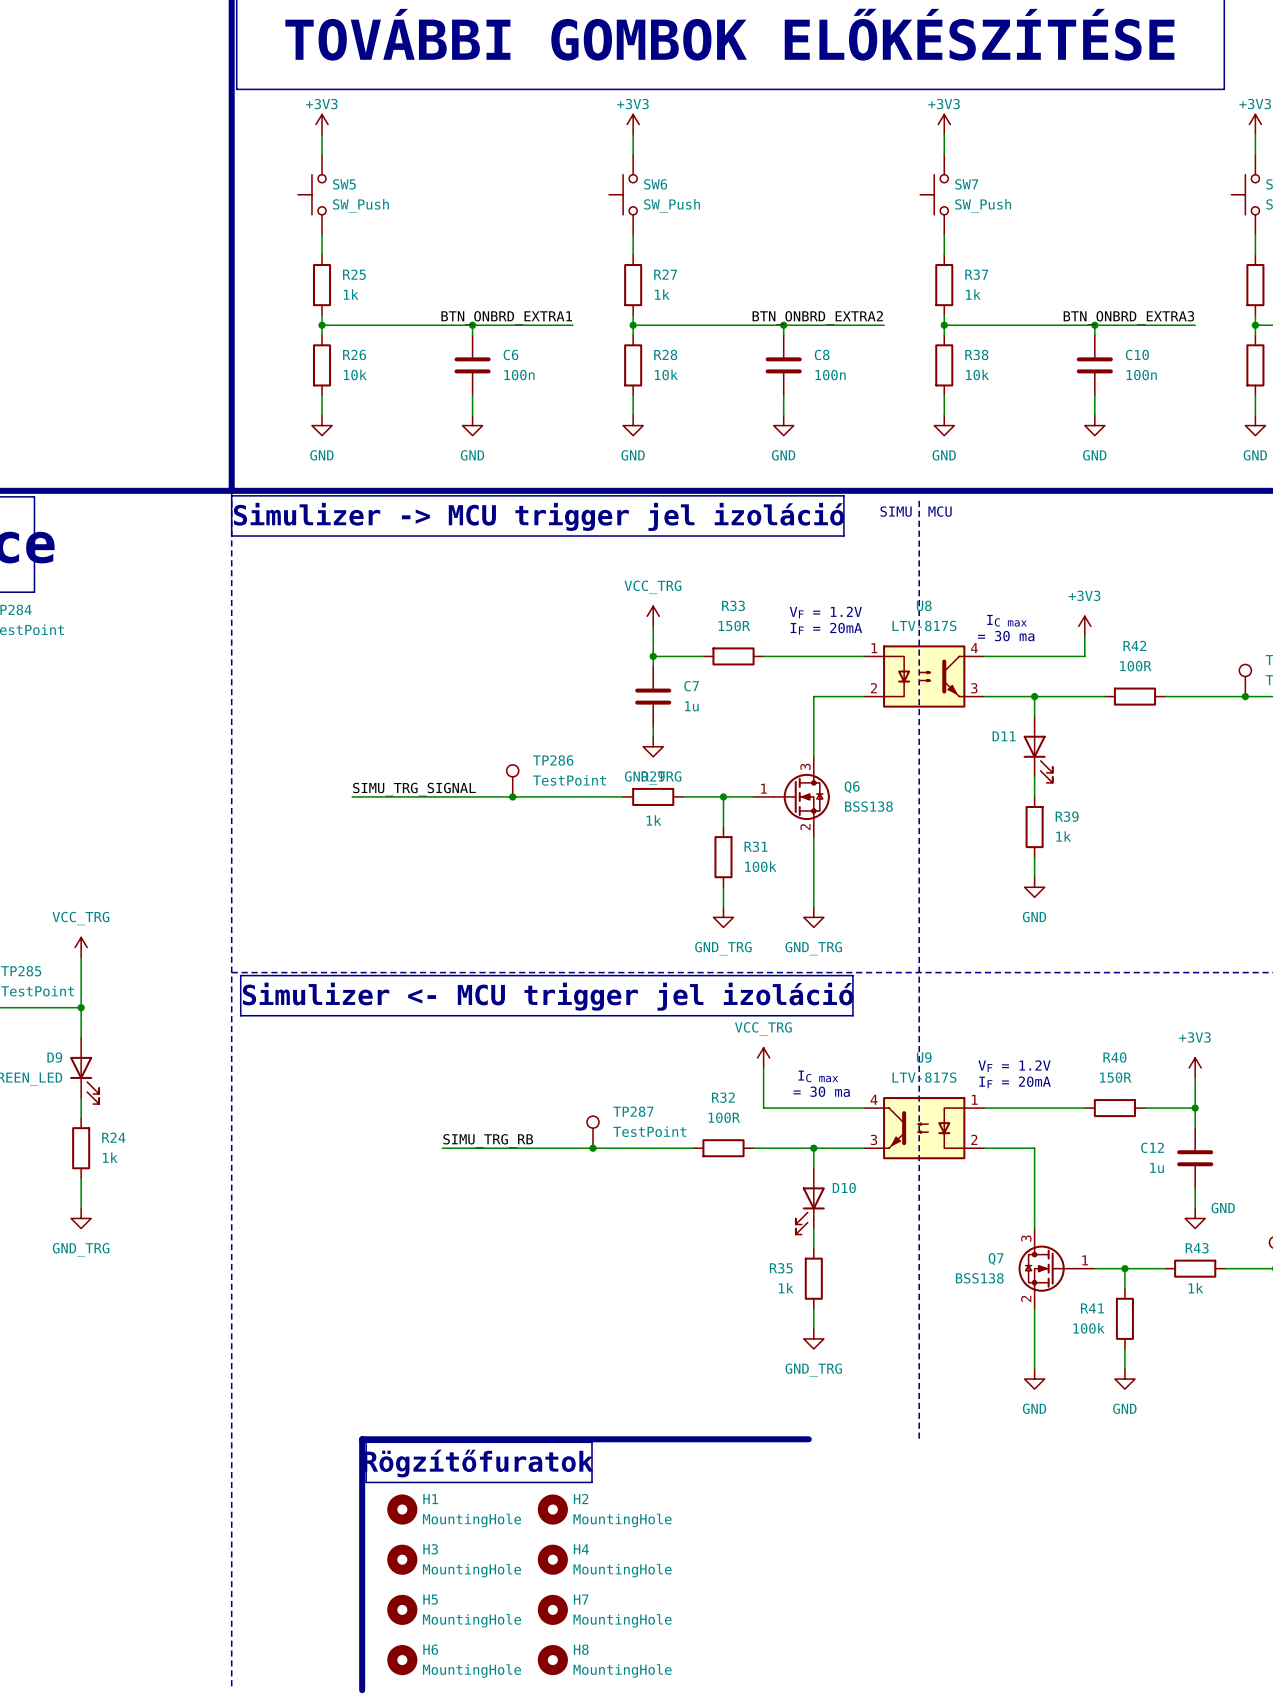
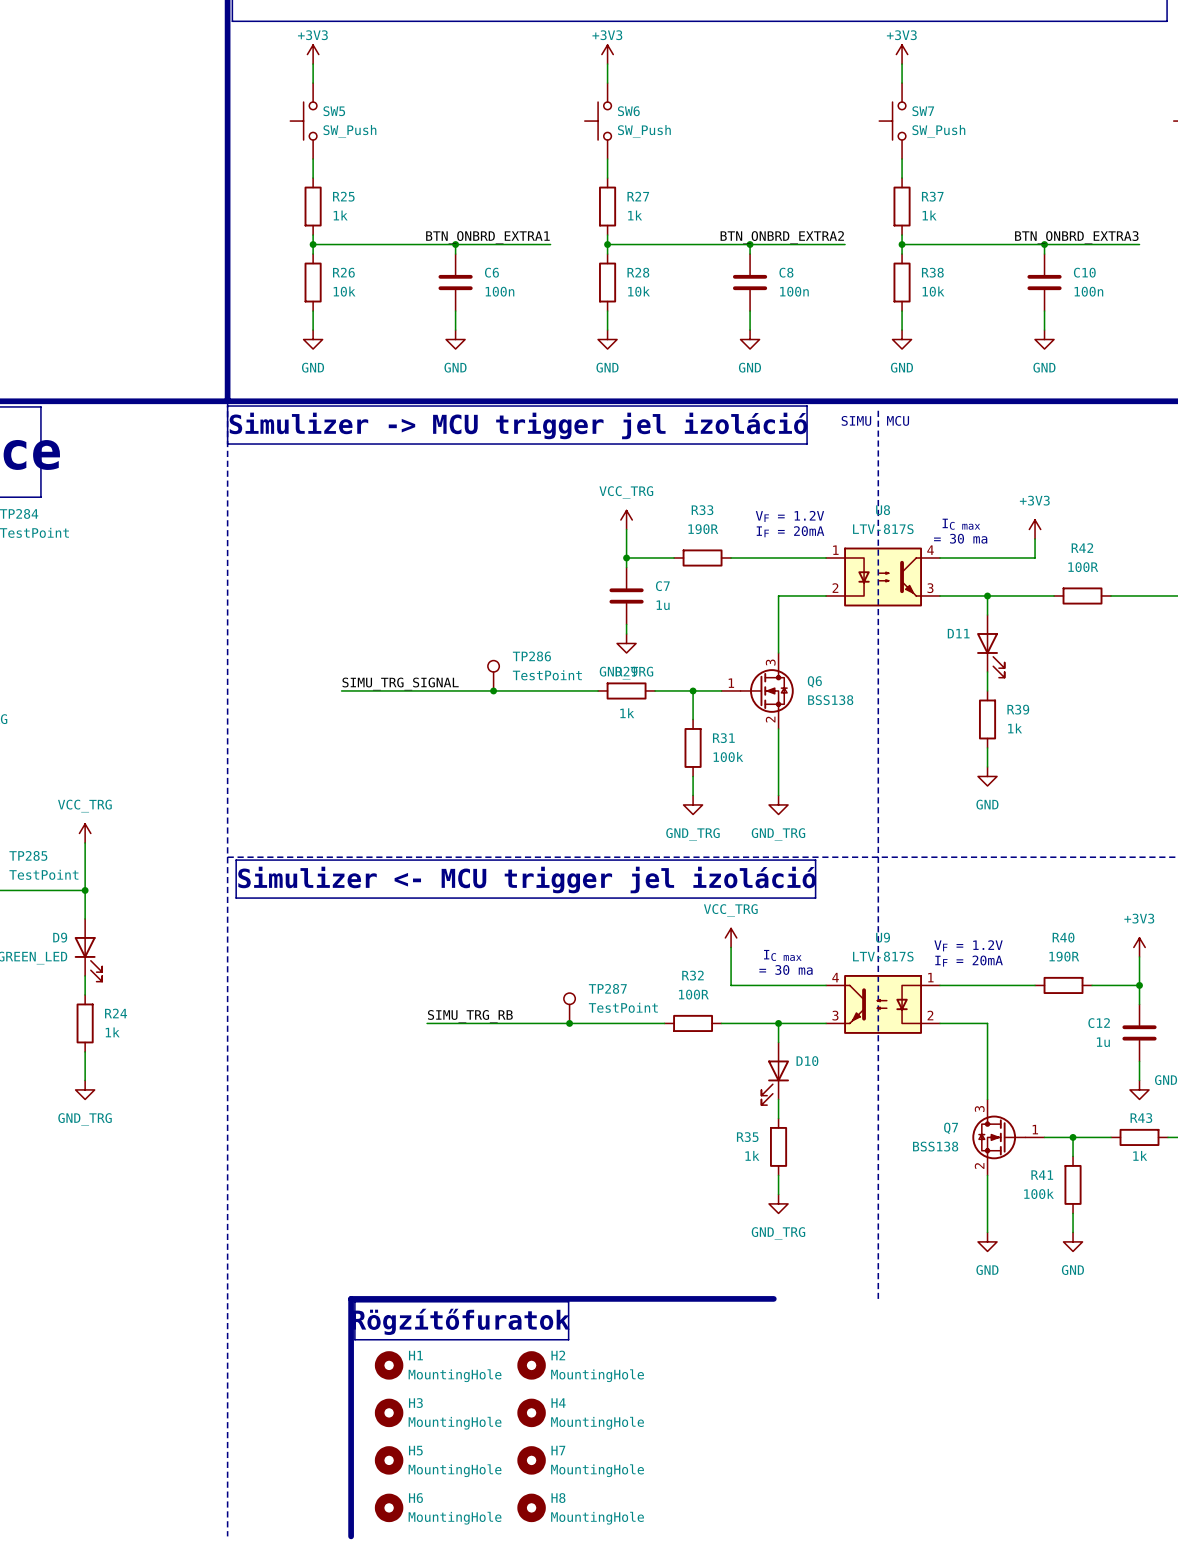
R33 value: 150R (734, 625) -> 190R (703, 529)
R40 value: 150R (1115, 1077) -> 190R (1064, 956)

